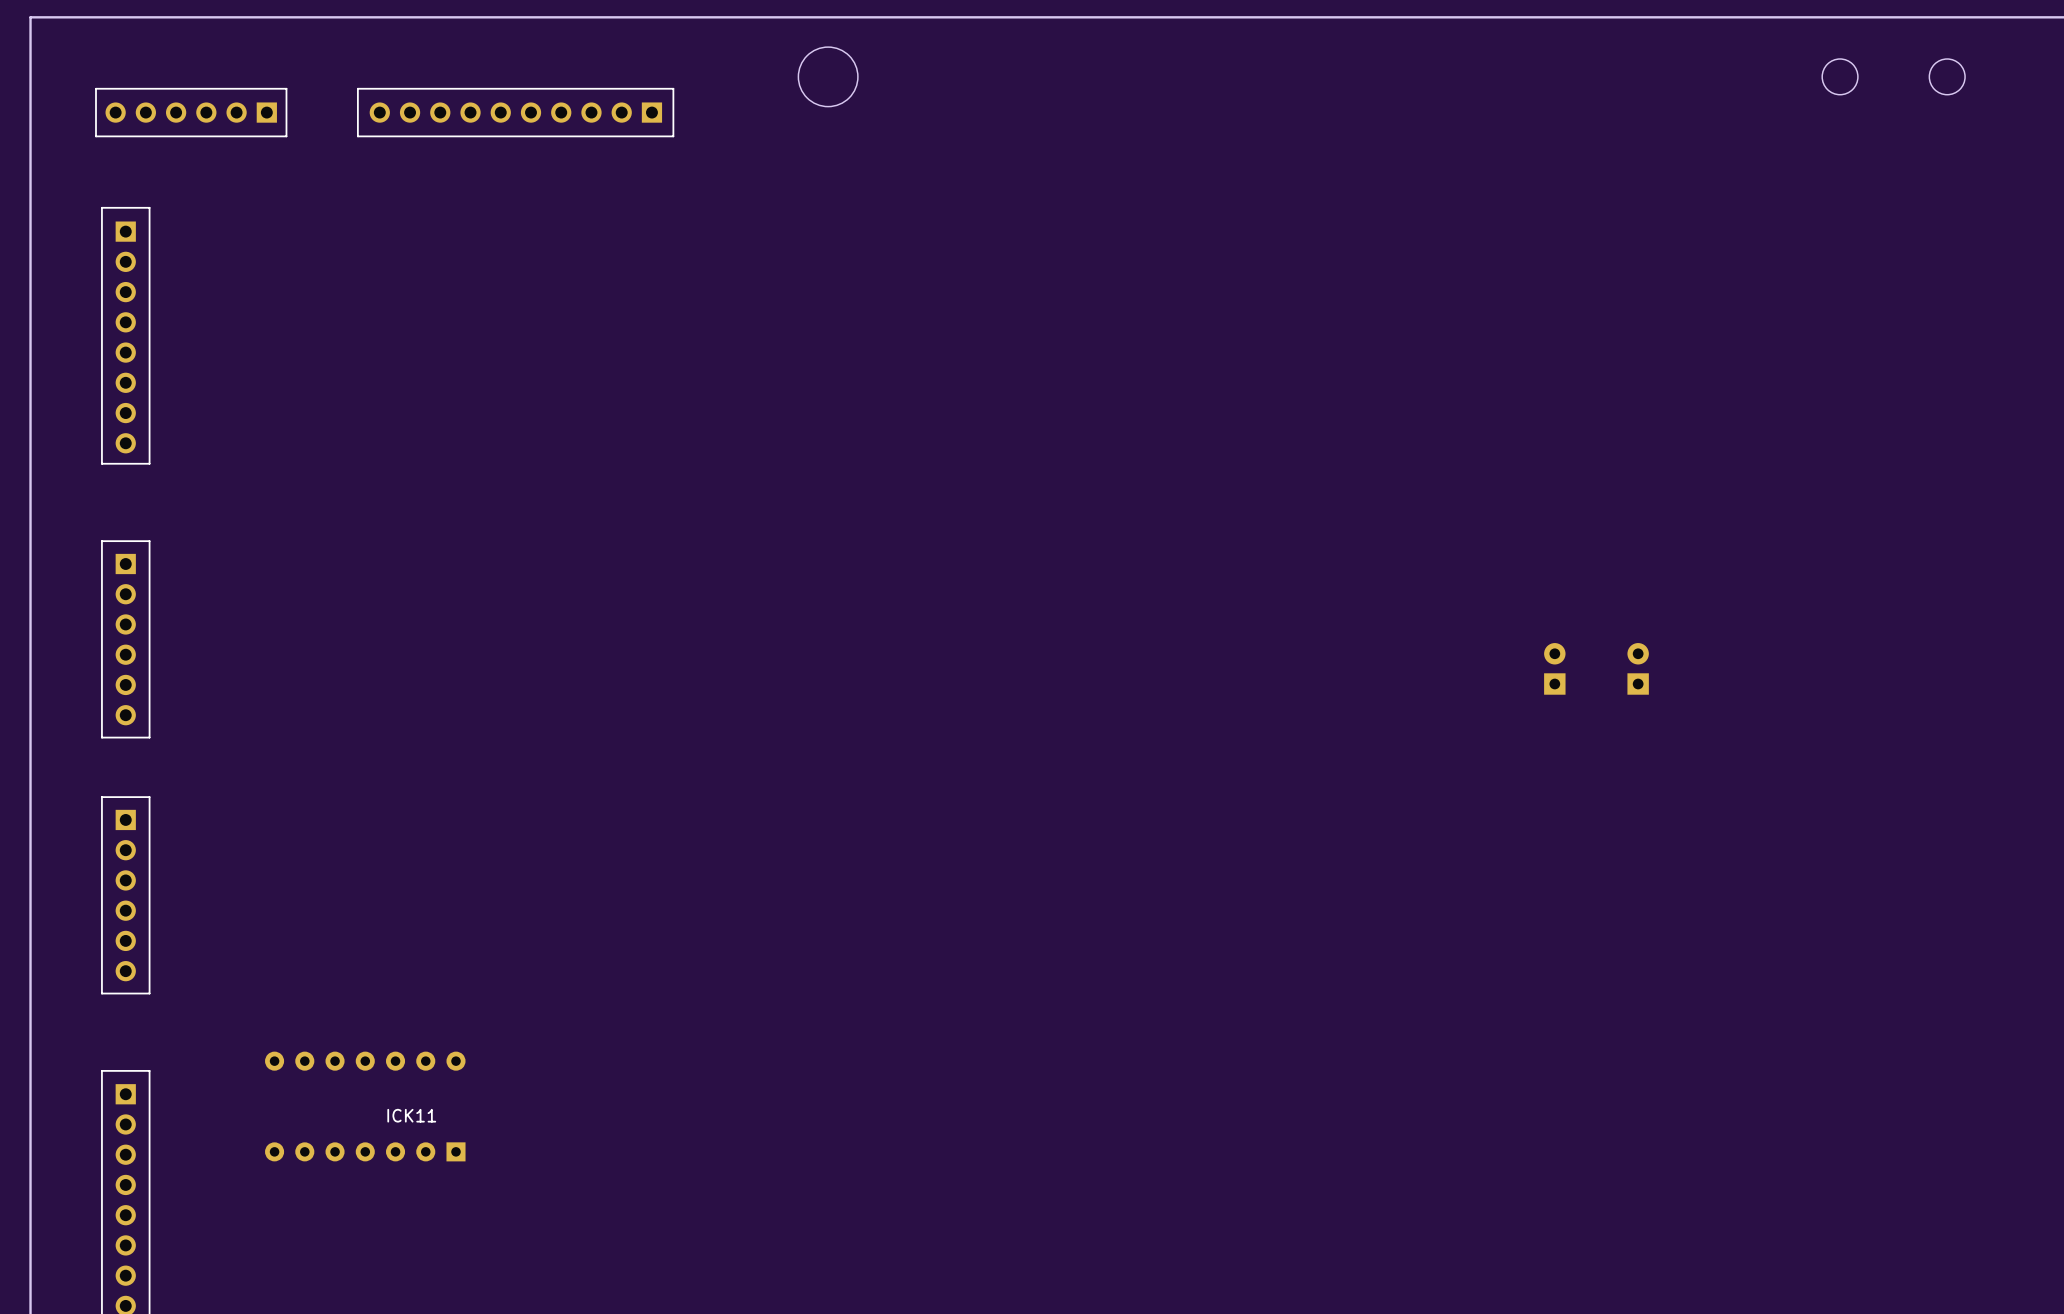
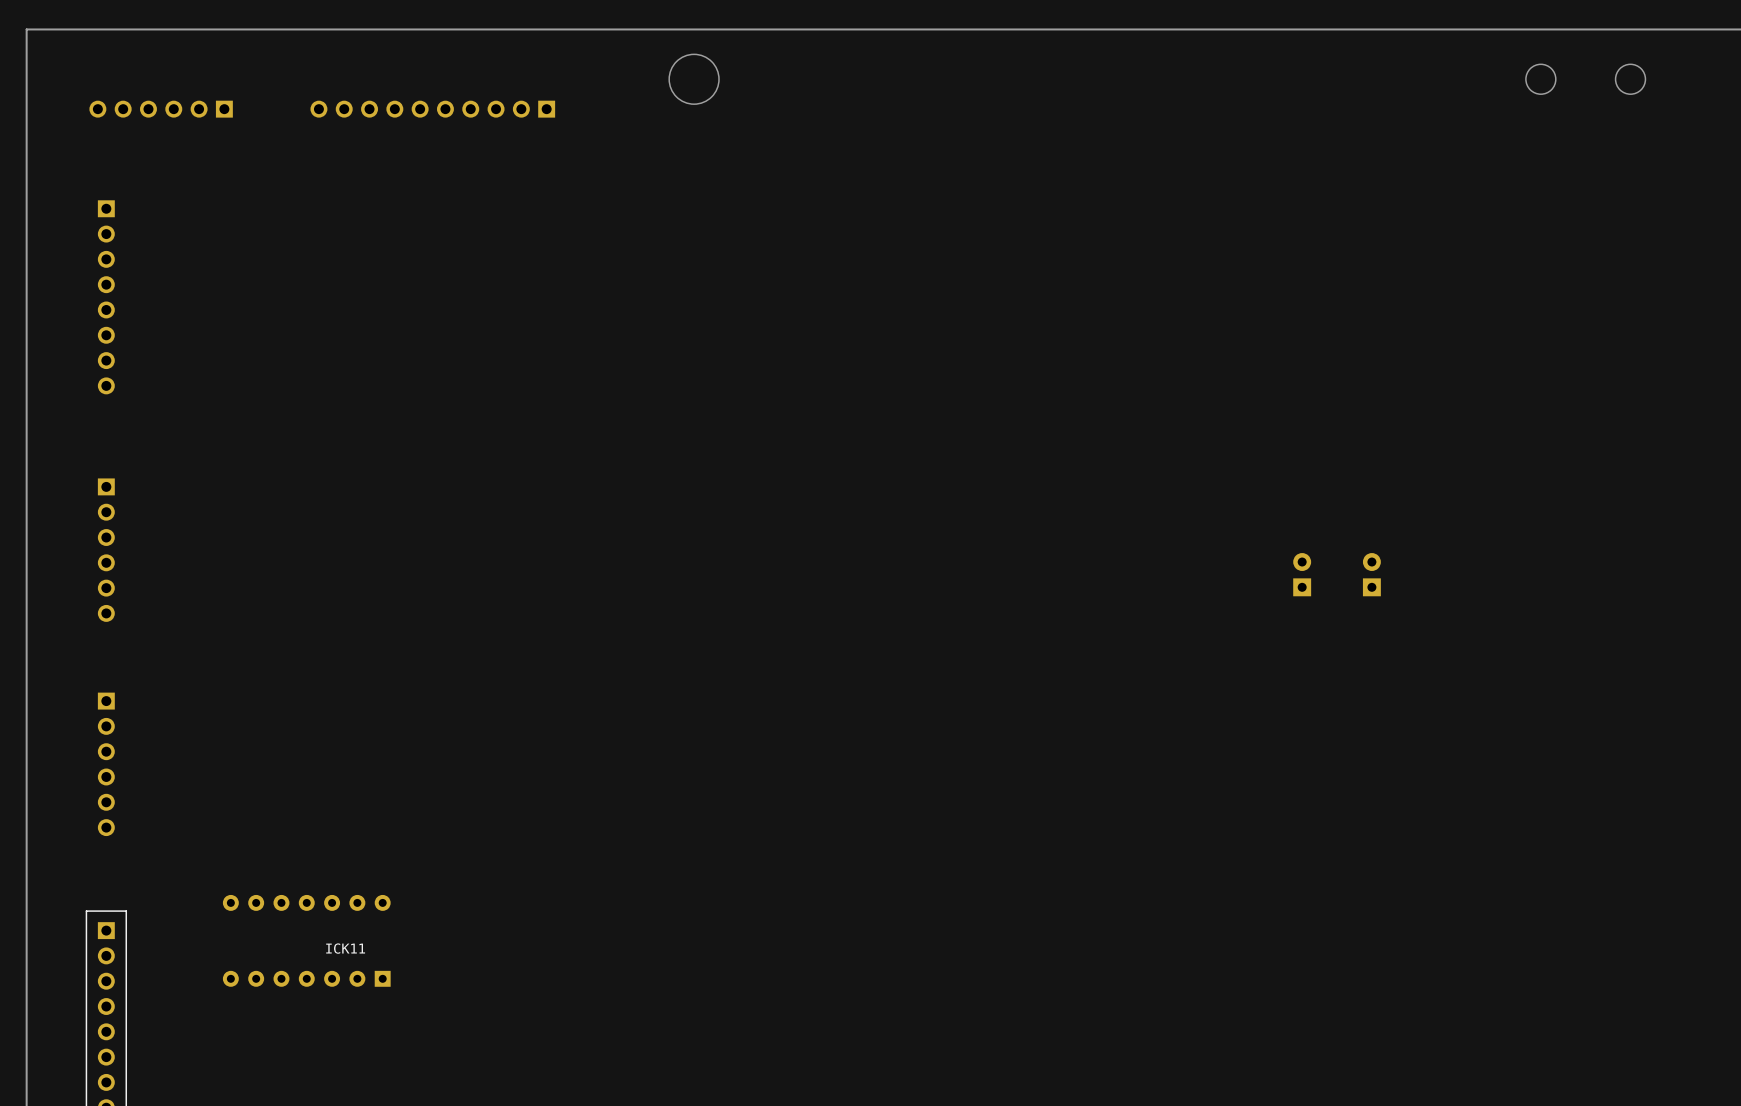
line: (286, 88) (95, 88) (95, 136) (286, 136) (286, 88) -> none
line: (673, 88) (357, 88) (357, 136) (673, 136) (673, 88) -> none
line: (149, 207) (149, 463) (101, 463) (101, 207) (149, 207) -> none
line: (149, 541) (149, 737) (101, 737) (101, 541) (149, 541) -> none
line: (149, 797) (149, 993) (101, 993) (101, 797) (149, 797) -> none

